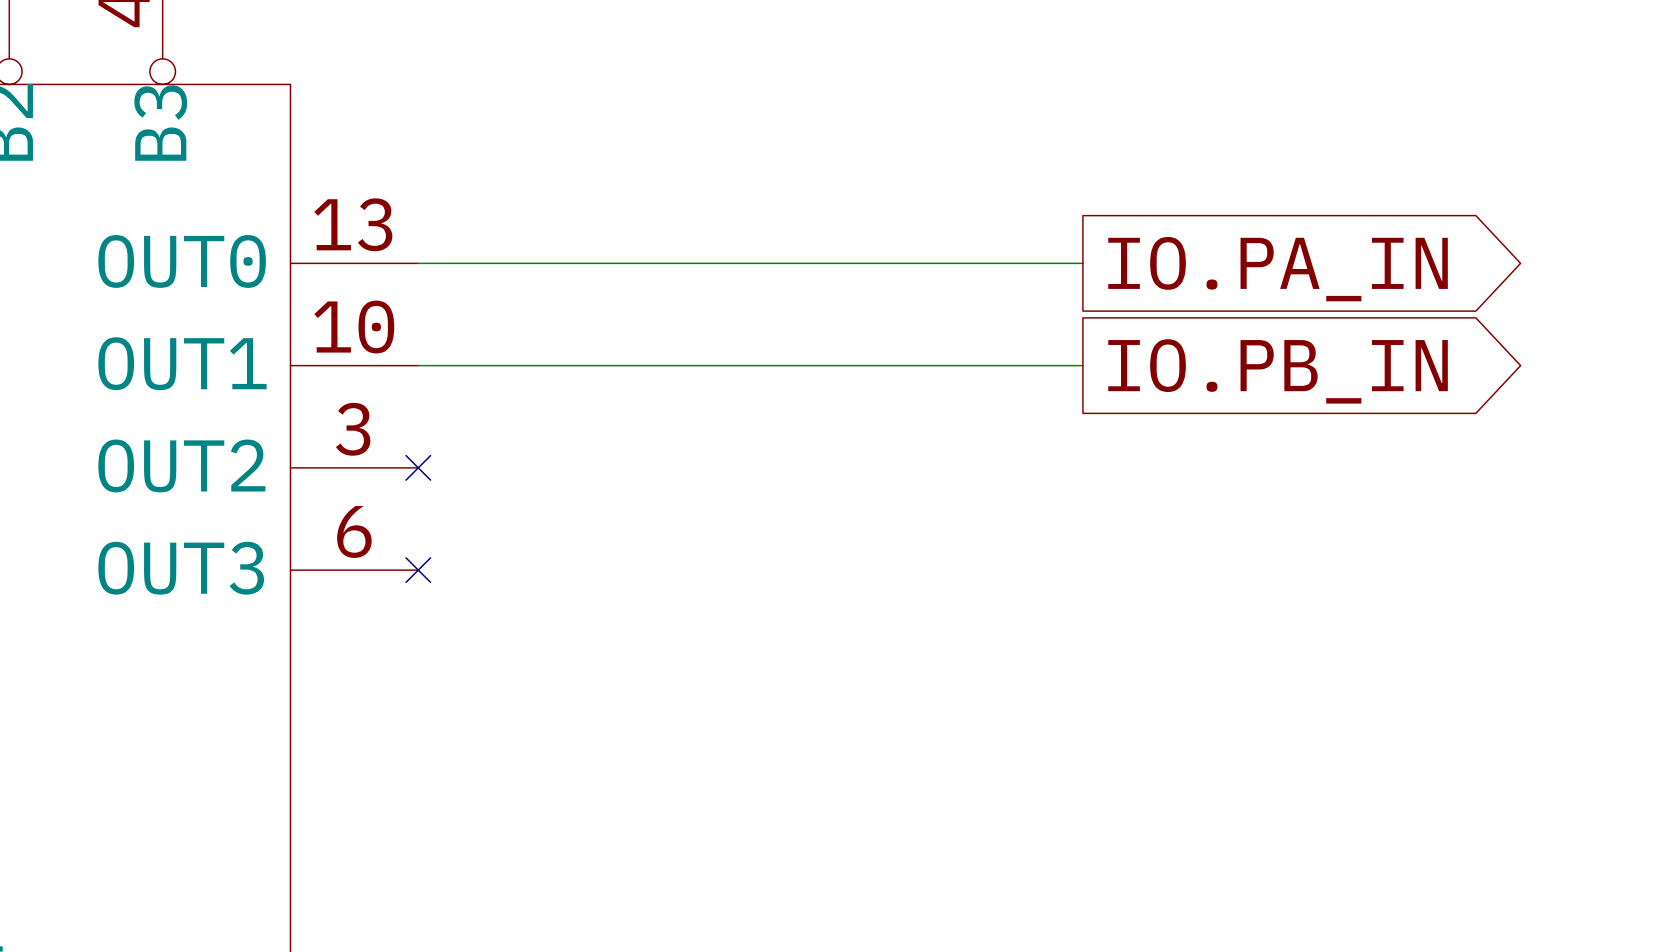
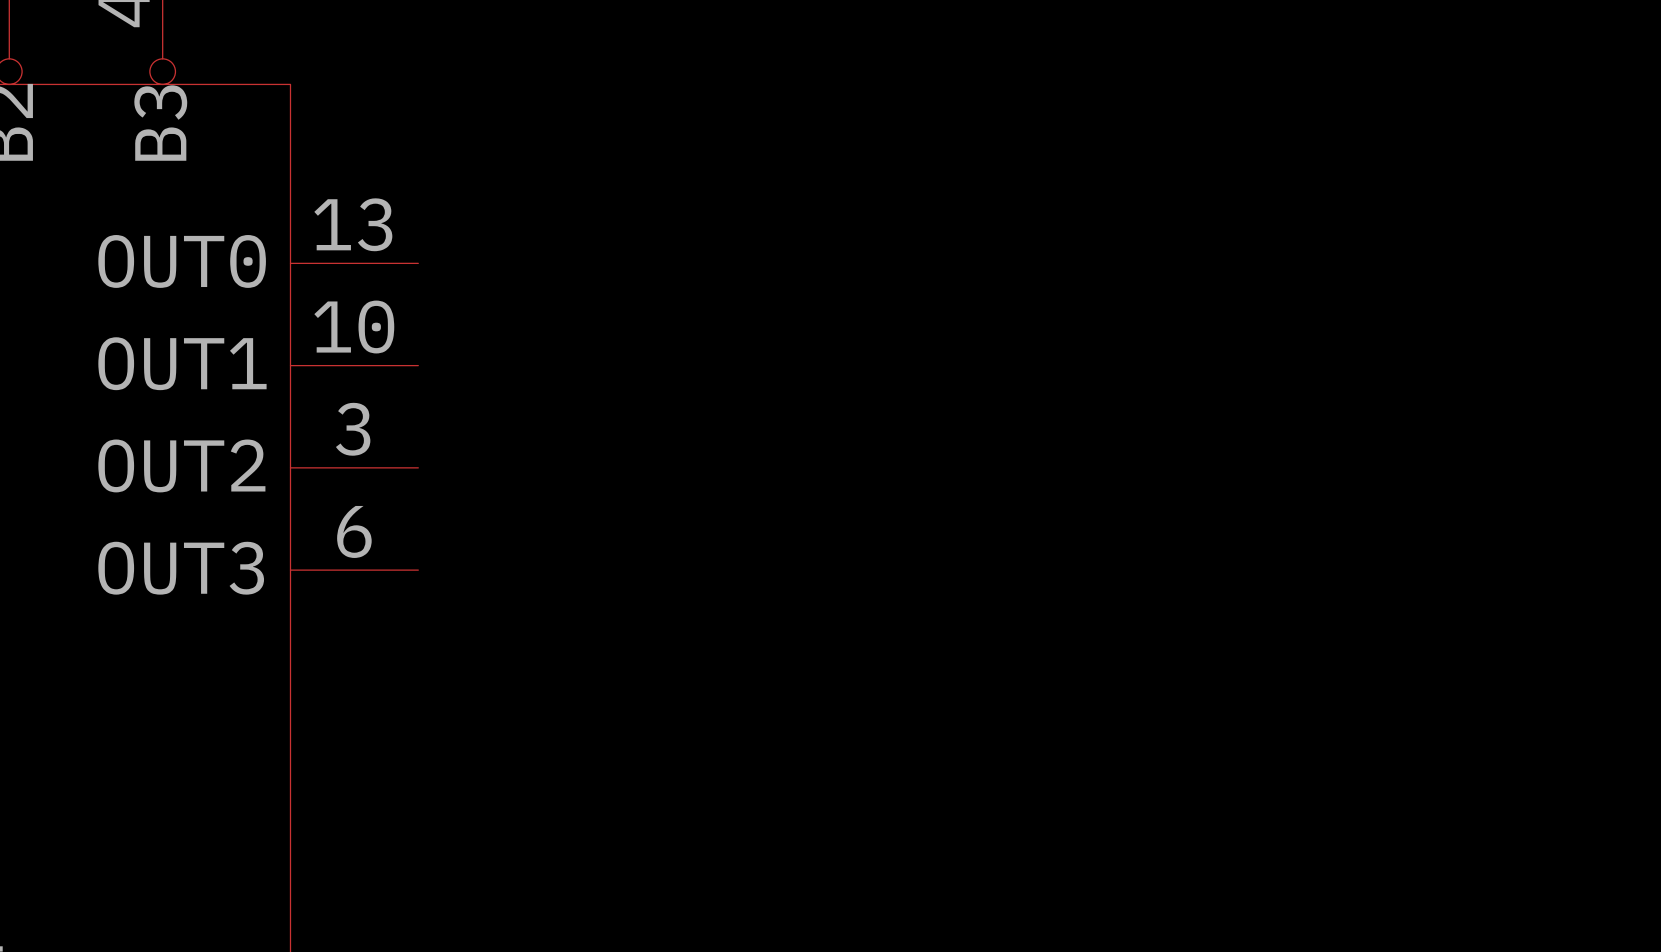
wire: (418, 263) (1082, 263) -> none
global label: IO.PA_IN (1278, 269) -> none
wire: (418, 365) (1082, 365) -> none
global label: IO.PB_IN (1278, 371) -> none
no-connect mark: (418, 467) -> none
no-connect mark: (418, 570) -> none

